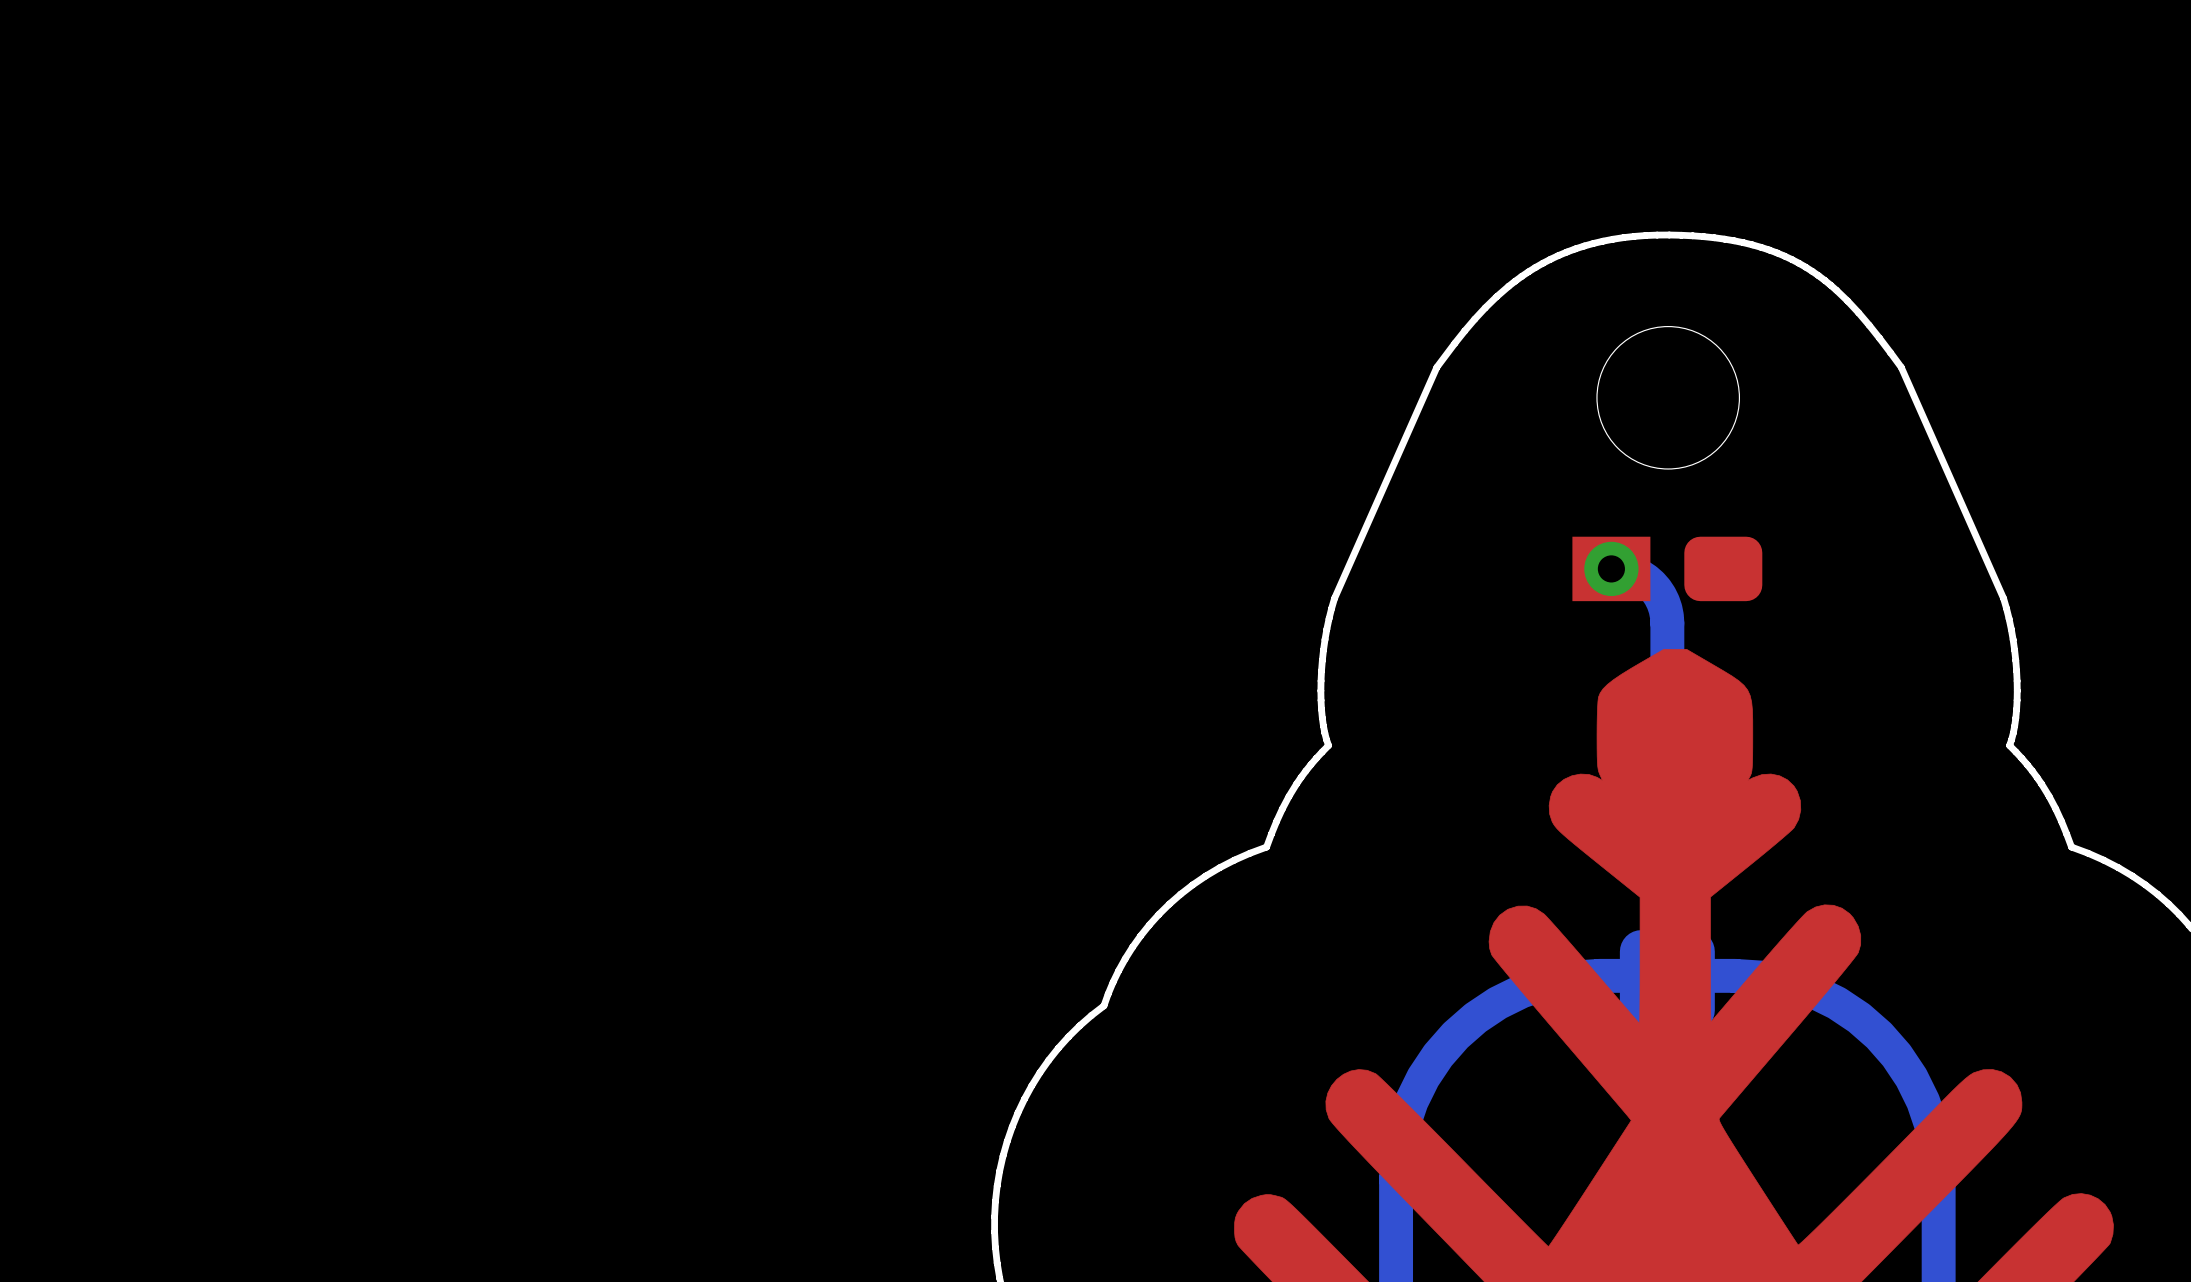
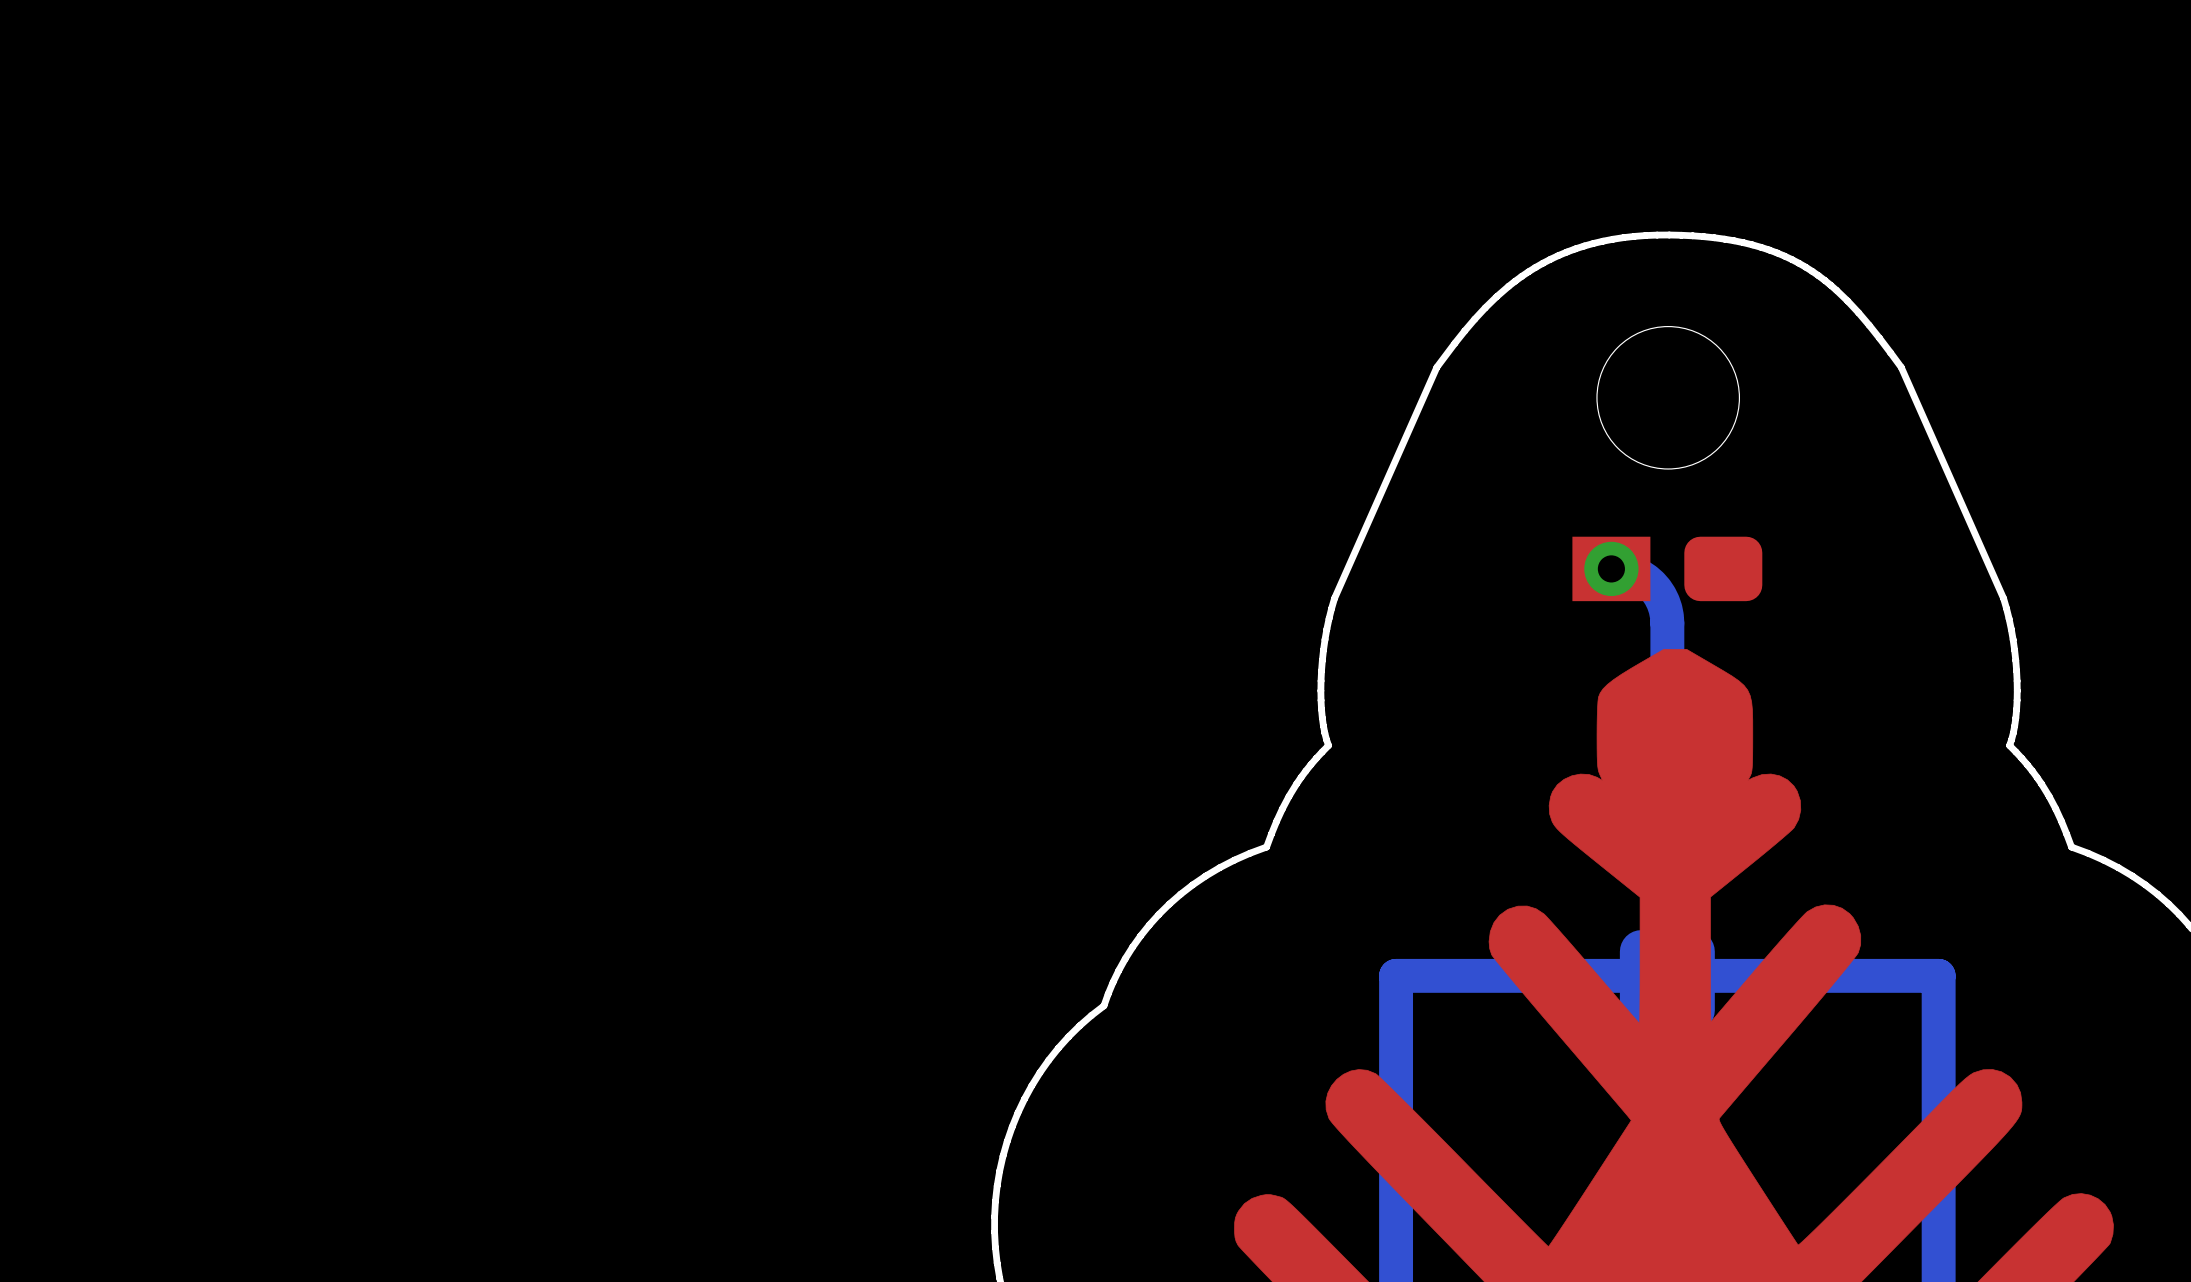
bottom track: (1599, 975) (1572, 977) (1546, 982) (1521, 991) (1497, 1003) (1475, 1017) (1455, 1035) (1438, 1055) (1423, 1077) (1411, 1101) (1402, 1126) (1397, 1152) (1396, 1179) -> (1599, 975) (1396, 975) (1396, 1179)
bottom track: (1735, 975) (1761, 977) (1787, 982) (1813, 991) (1836, 1003) (1859, 1017) (1879, 1035) (1896, 1055) (1911, 1077) (1923, 1101) (1931, 1126) (1936, 1152) (1938, 1179) -> (1735, 975) (1938, 975) (1938, 1179)

